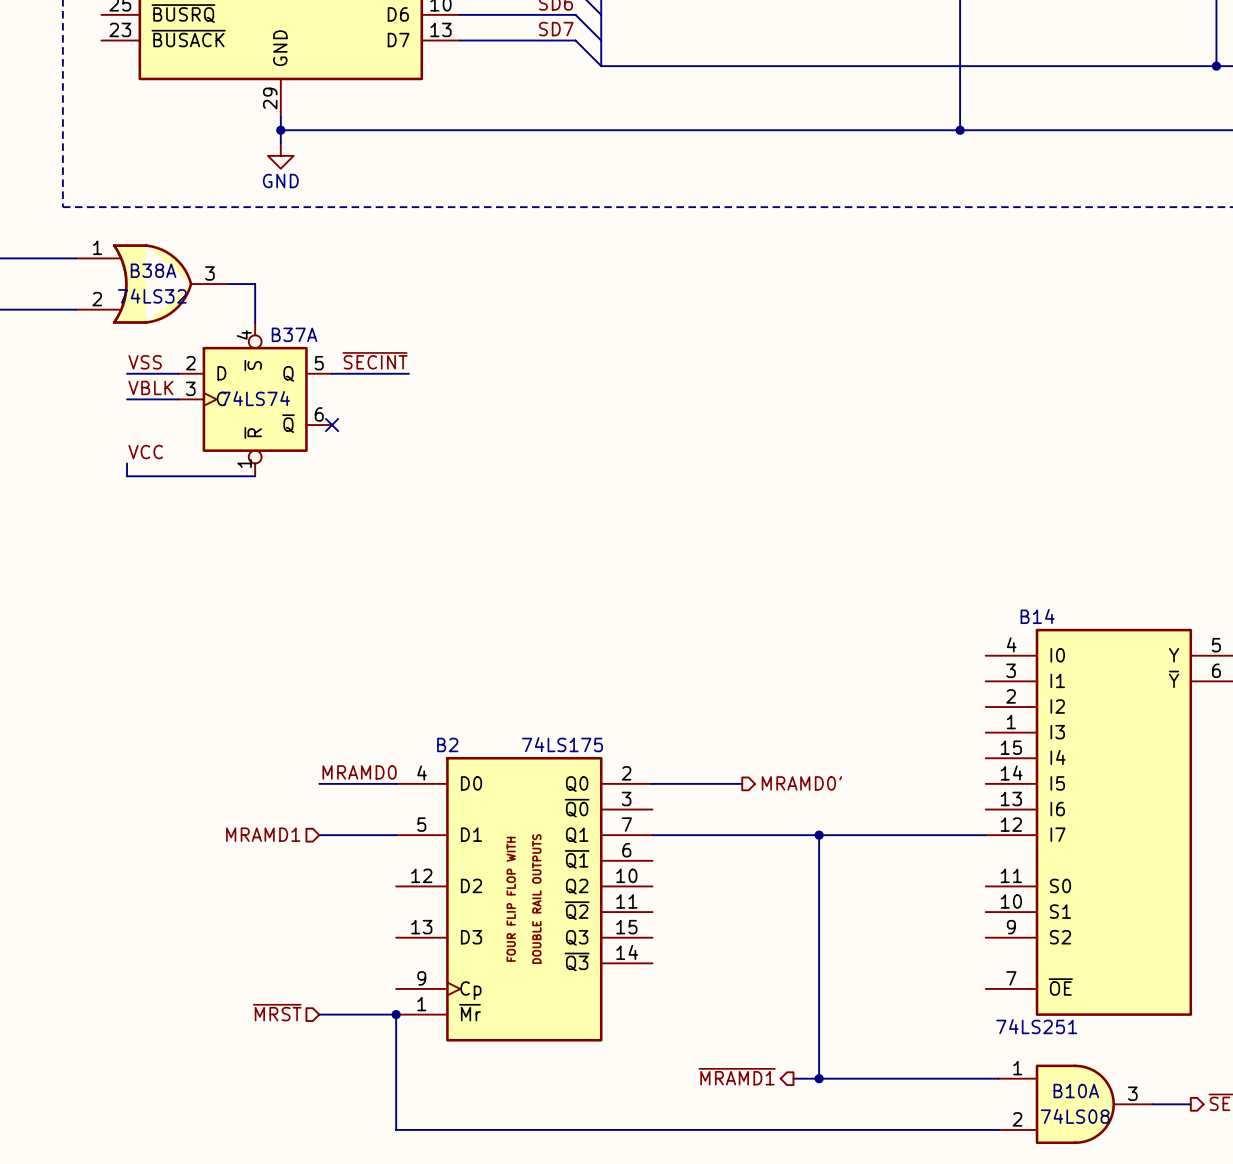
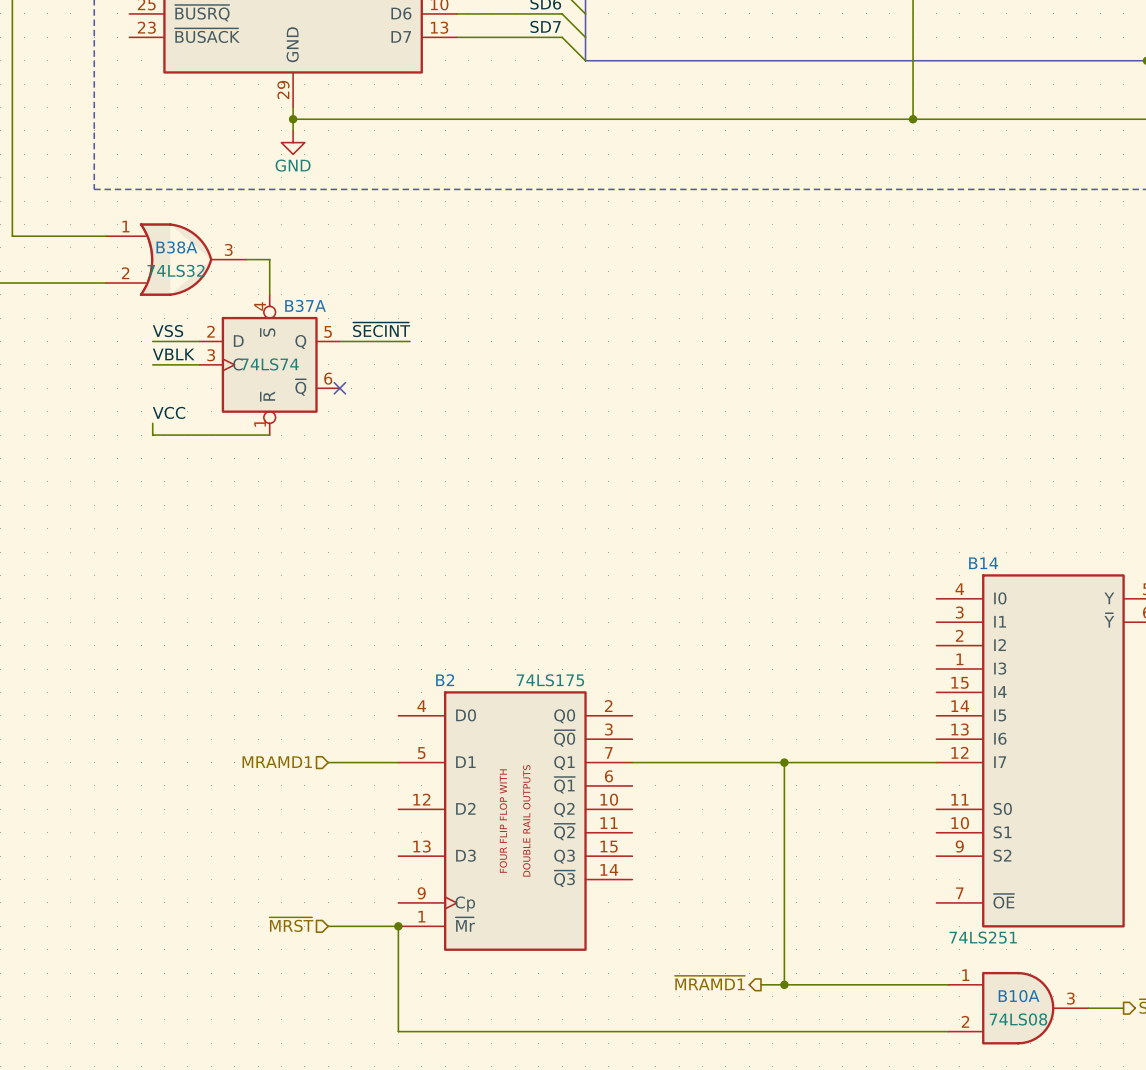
label: MRAMD0 (359, 772) -> none
wire: (319, 783) (396, 783) -> none
wire: (652, 783) (742, 783) -> none
hierarchical label: MRAMD0' (801, 783) -> none

